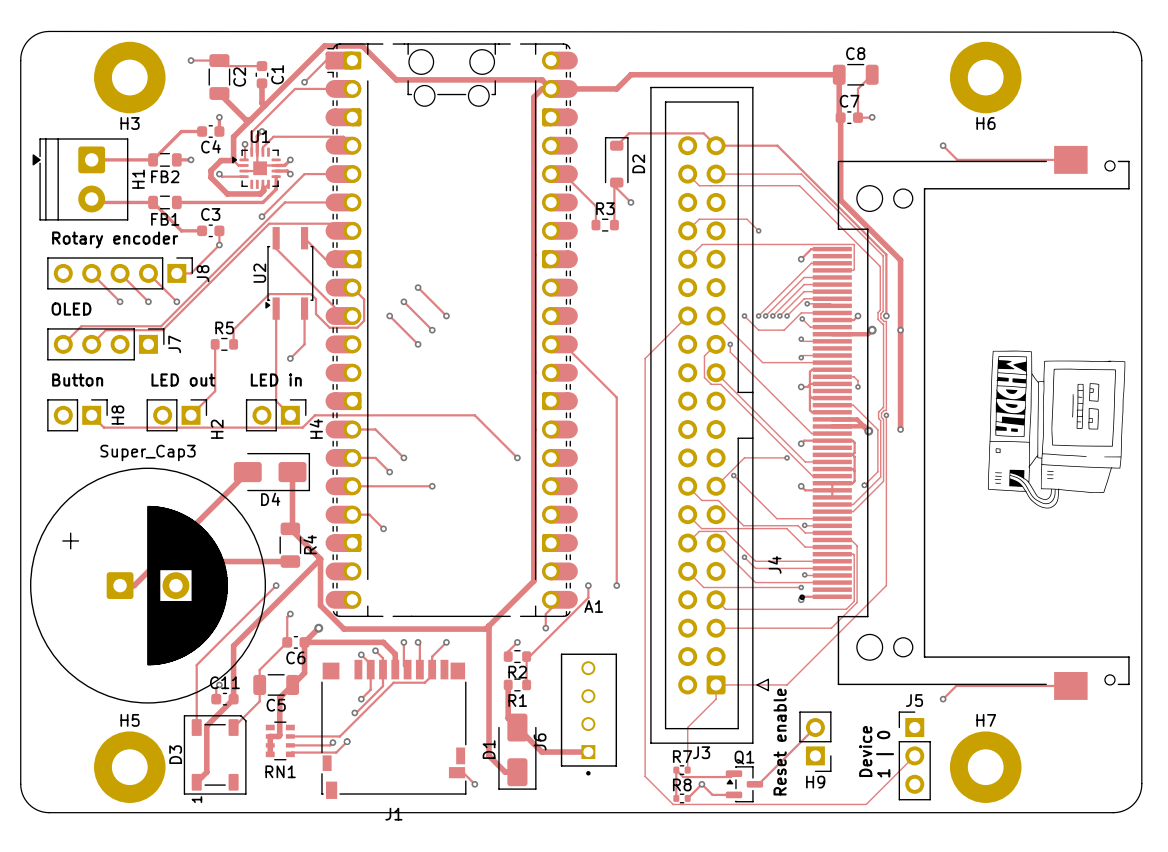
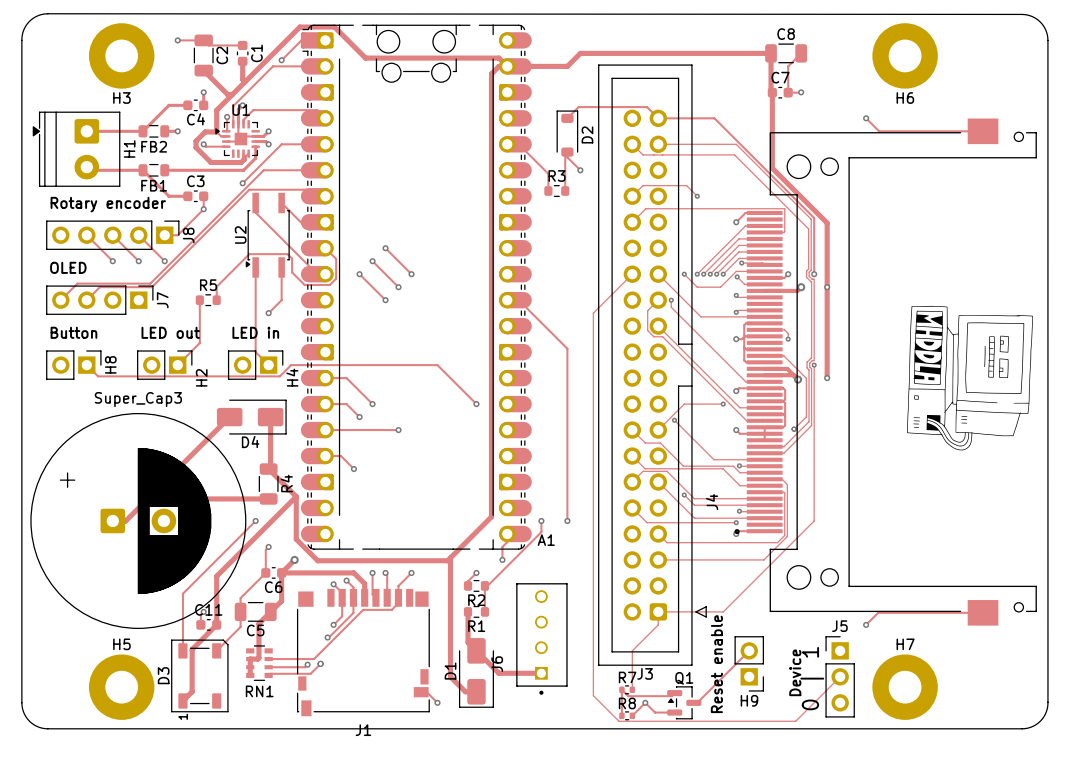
text: 1 | 0 (885, 754) -> none
text: none -> 0 | 1 (812, 678)

